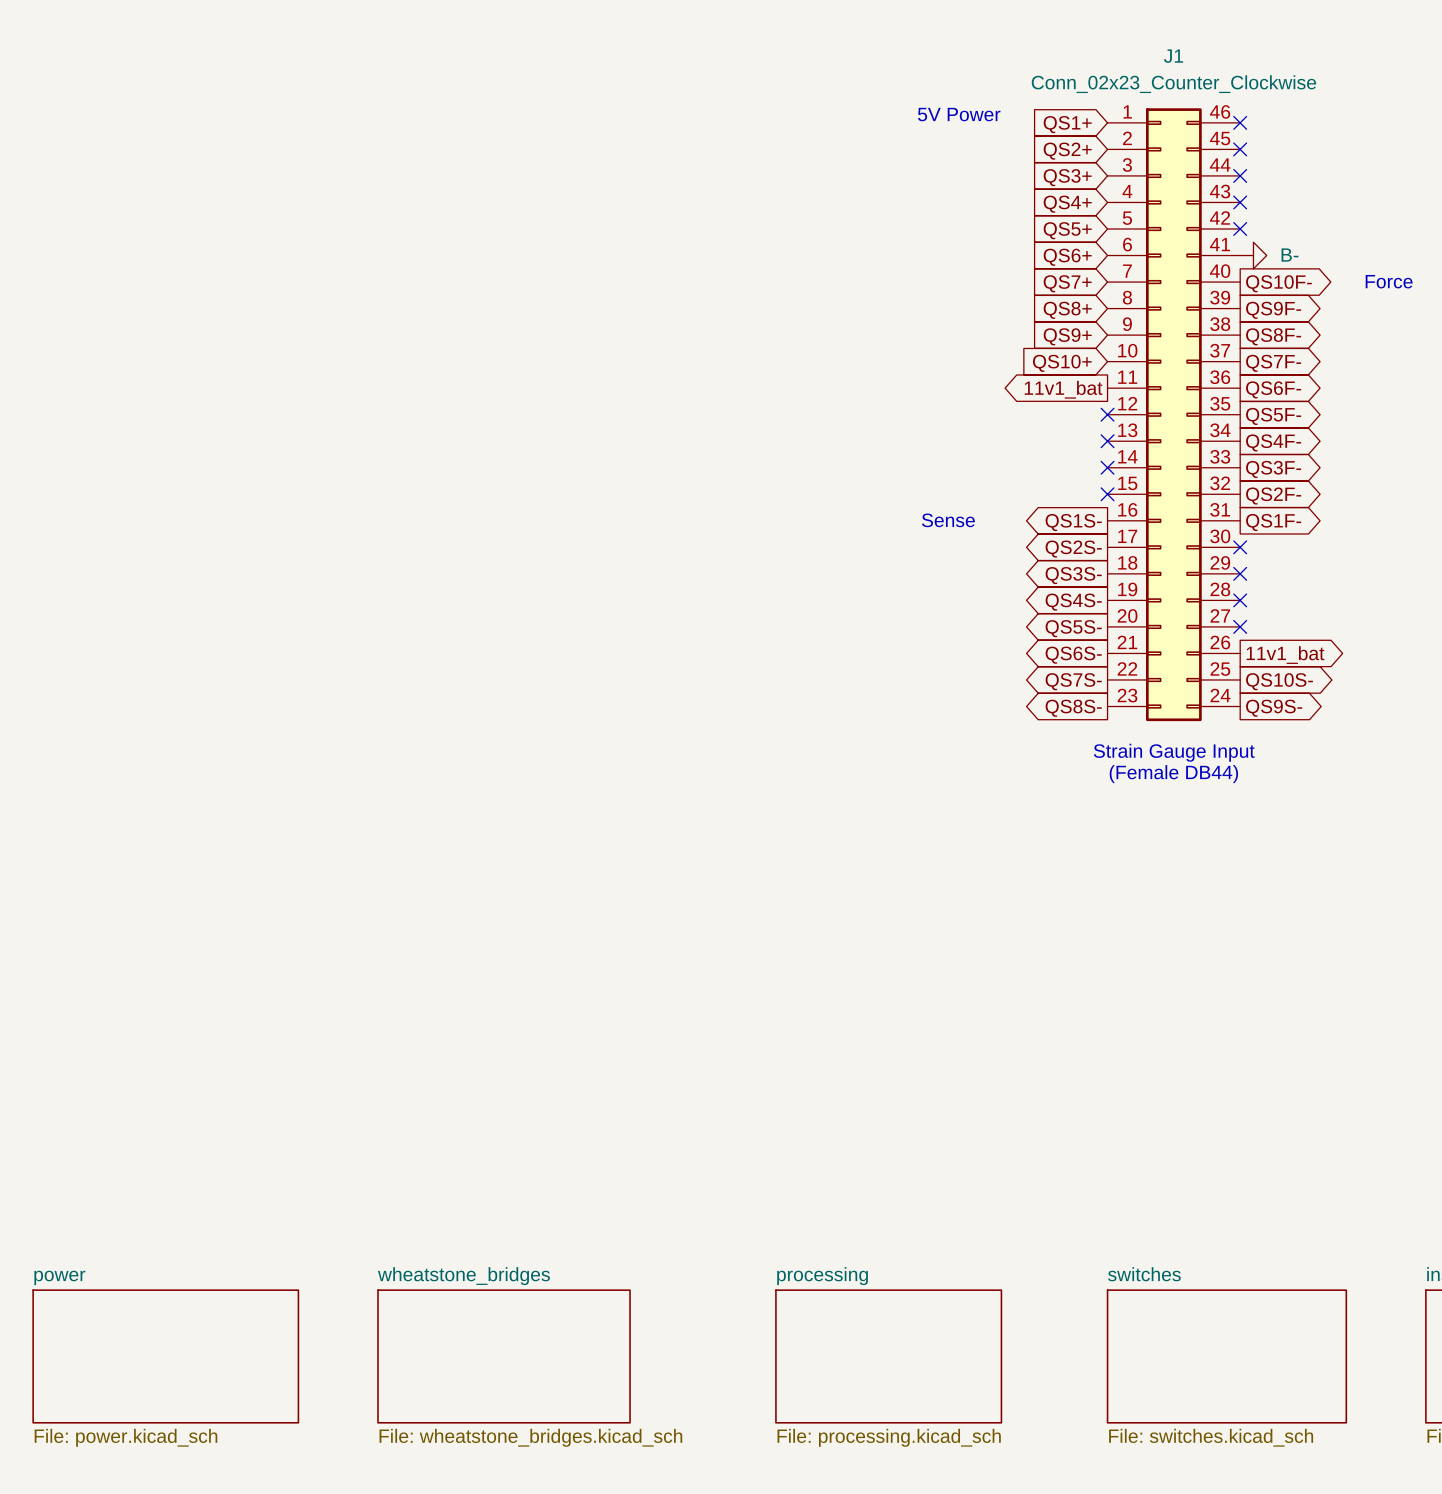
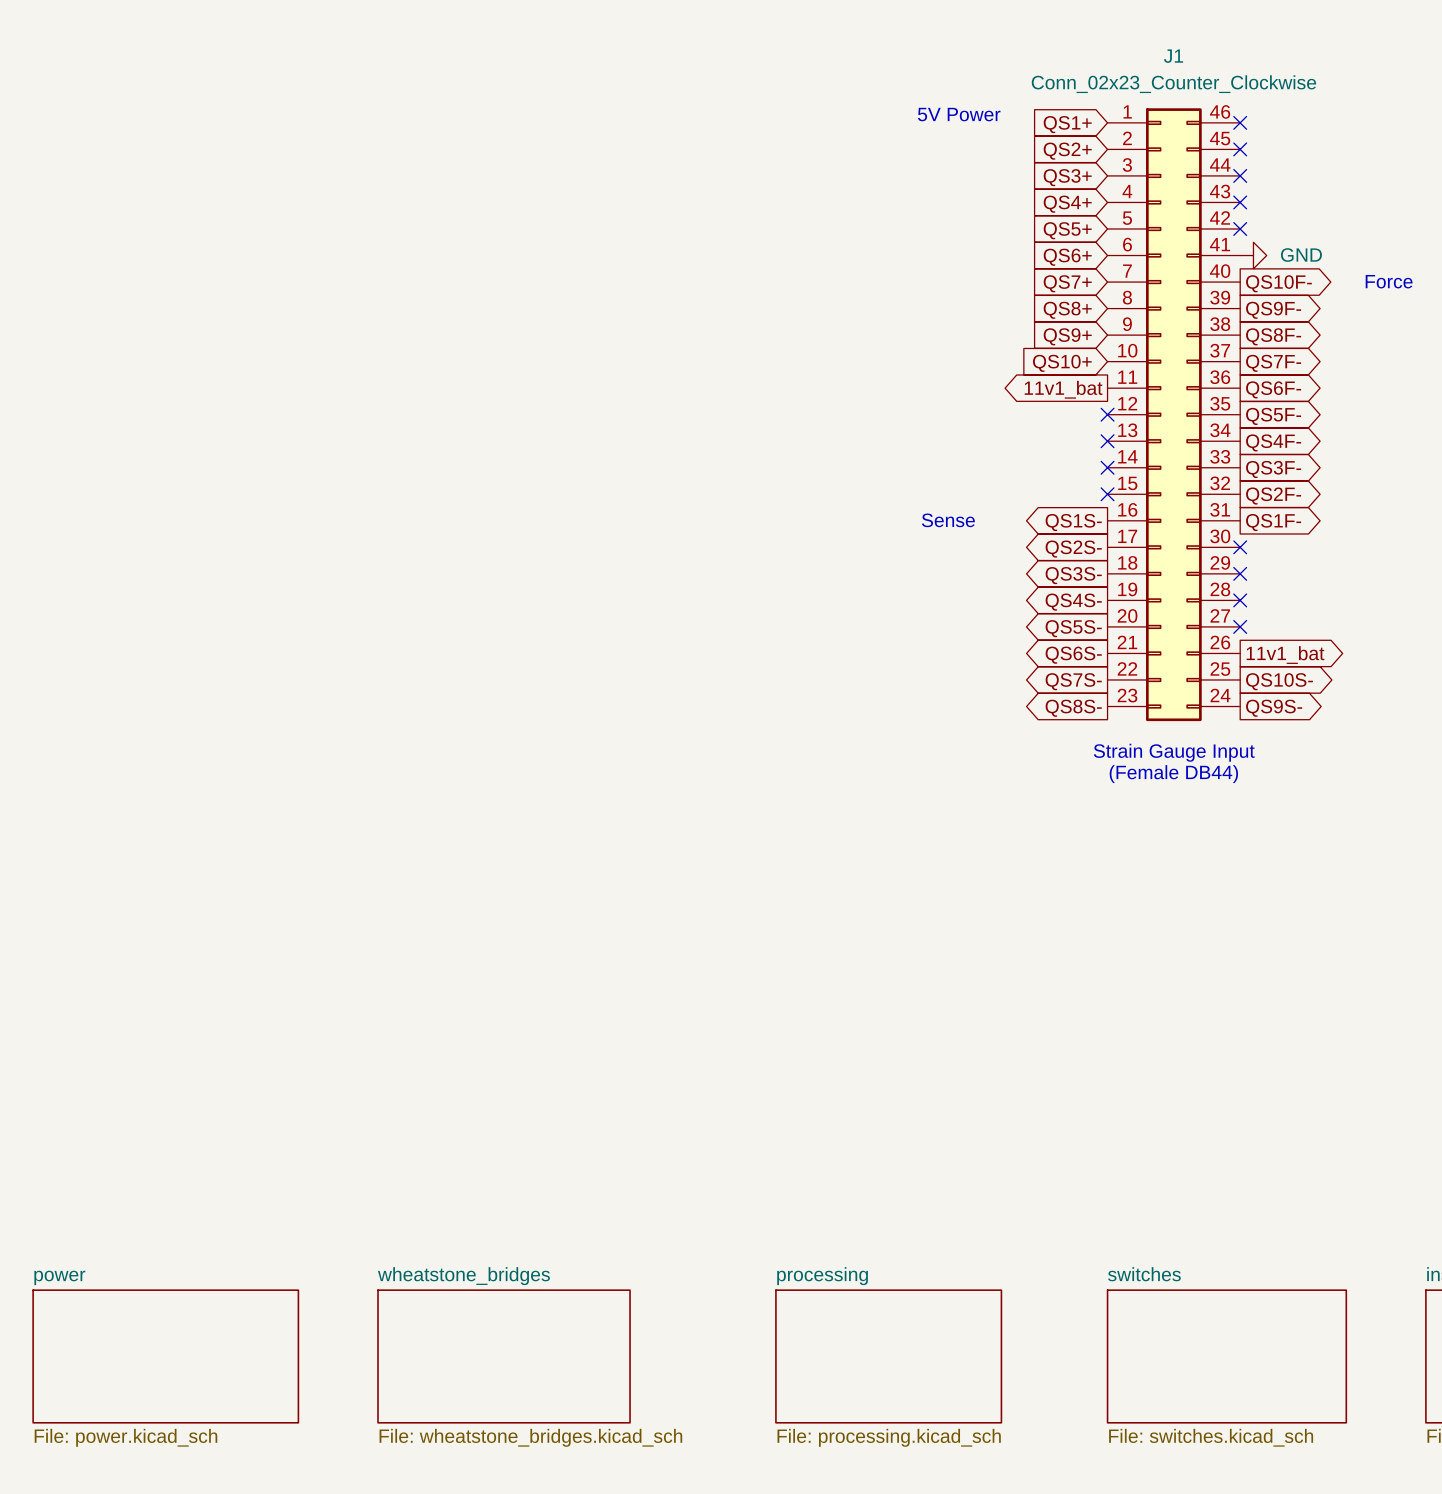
power symbol: B- (1253, 255) -> GND (1253, 255)

